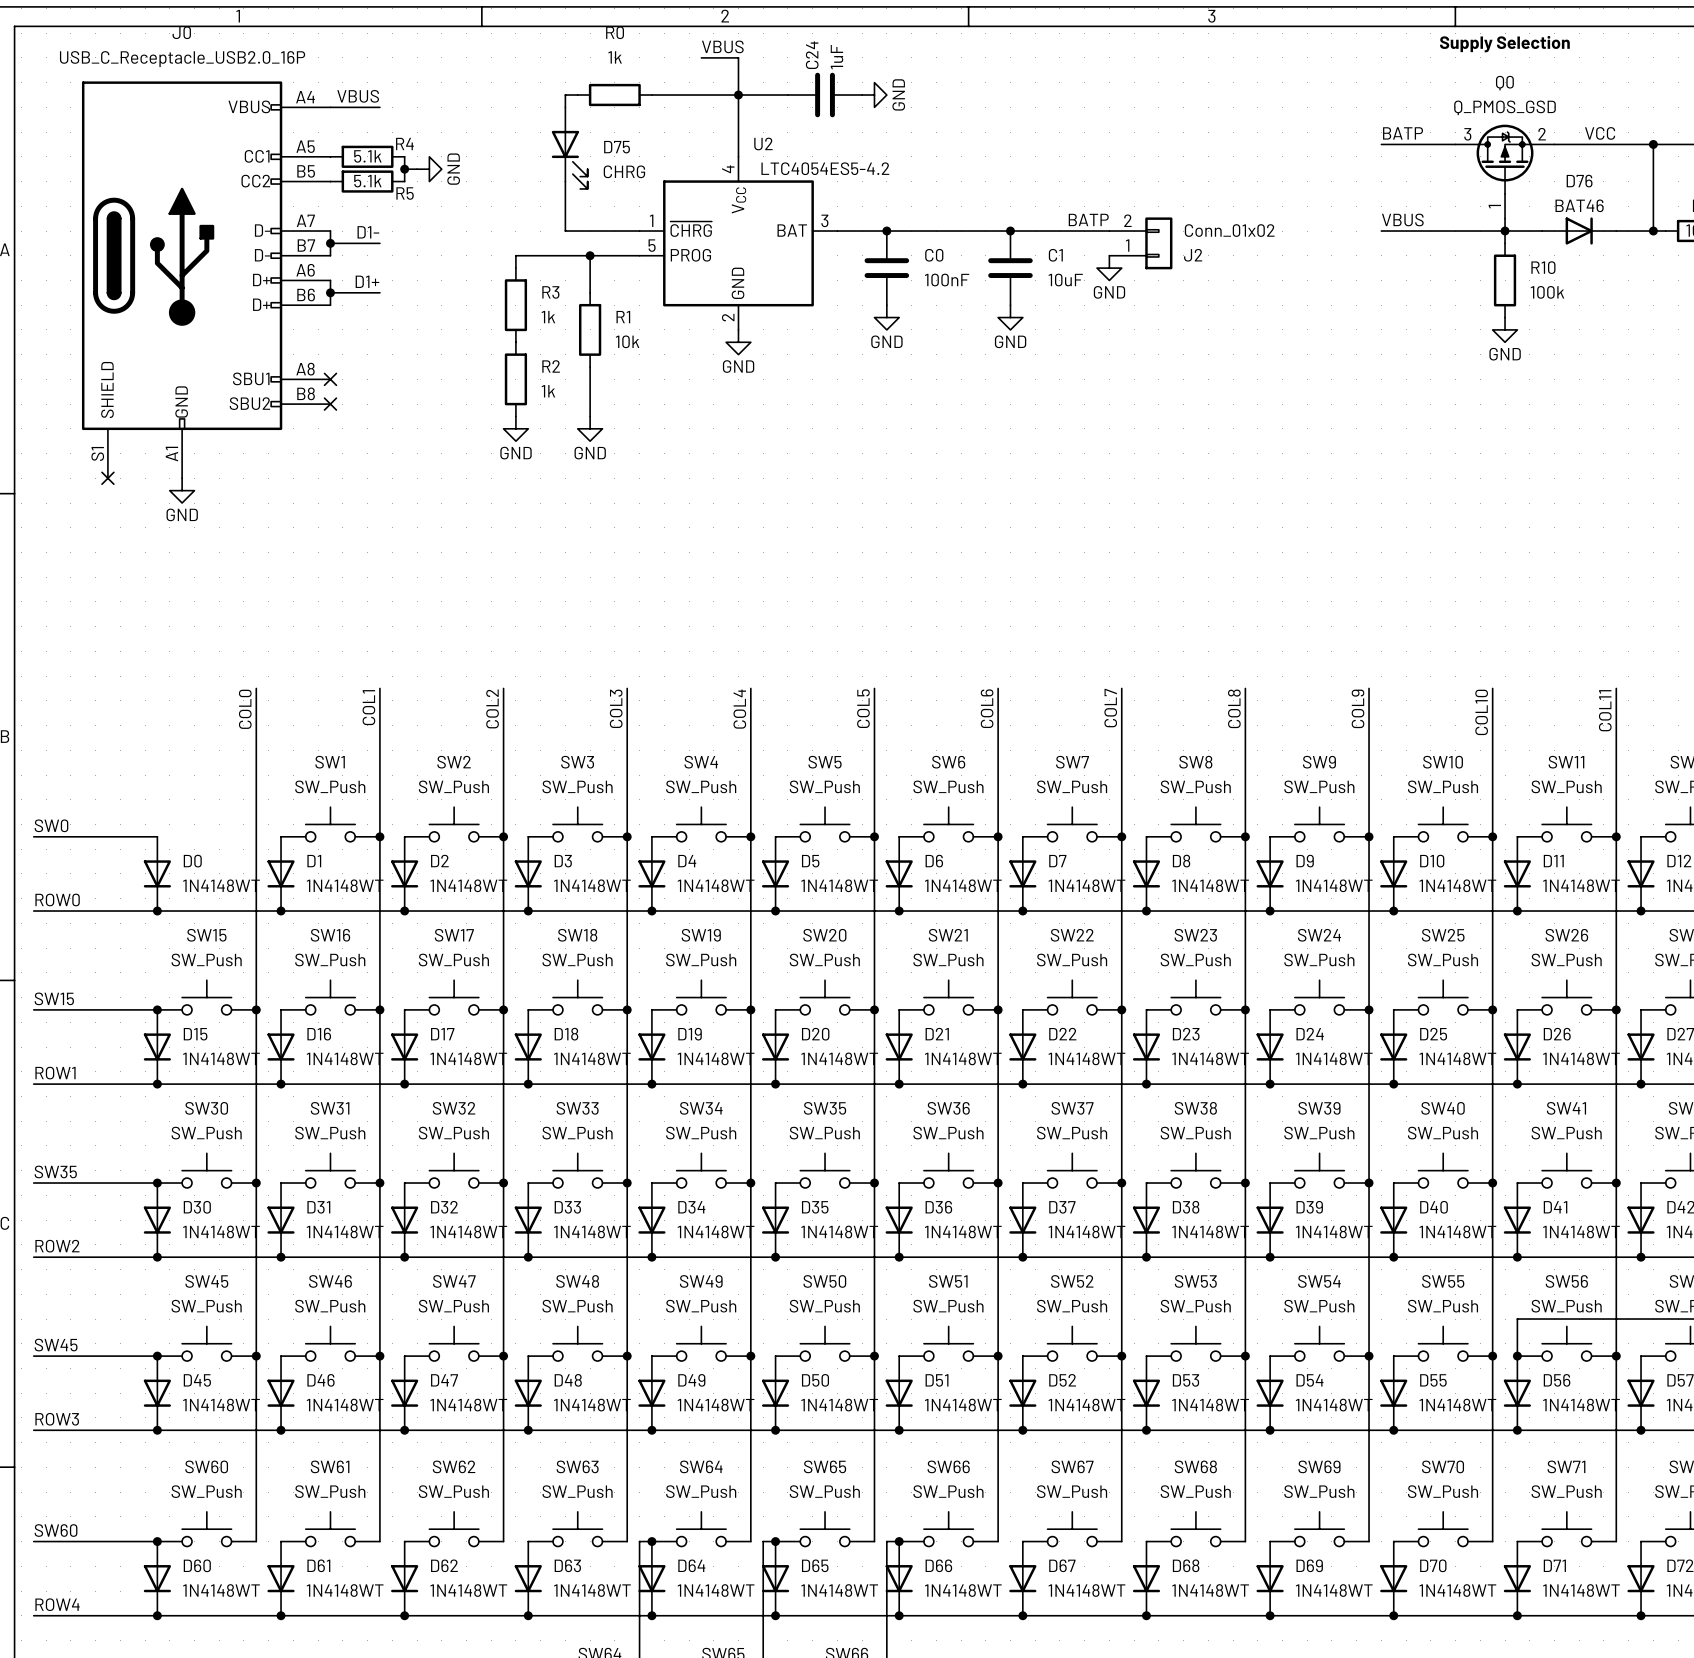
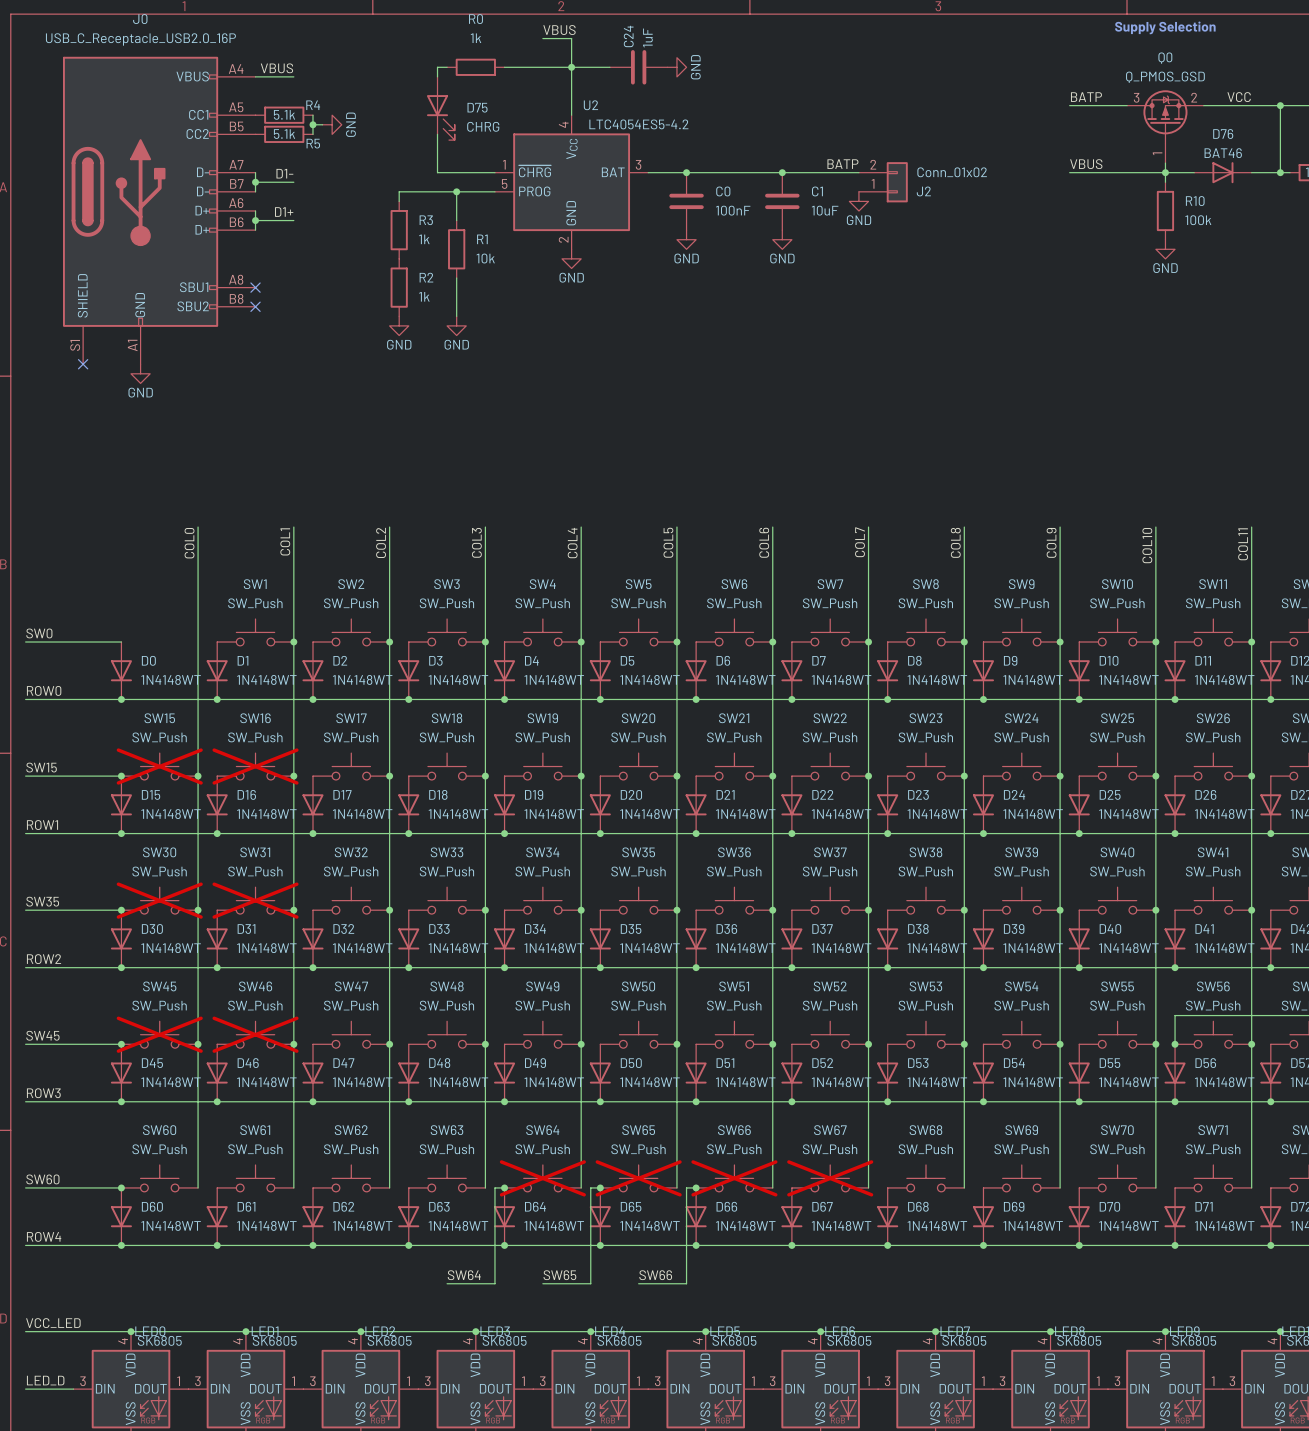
SW15 do-not-place cross: none -> (159, 766)
SW16 do-not-place cross: none -> (255, 766)
SW30 do-not-place cross: none -> (159, 900)
SW31 do-not-place cross: none -> (255, 900)
SW45 do-not-place cross: none -> (159, 1034)
SW46 do-not-place cross: none -> (255, 1034)
SW64 do-not-place cross: none -> (542, 1178)
SW65 do-not-place cross: none -> (638, 1178)
SW66 do-not-place cross: none -> (734, 1178)
SW67 do-not-place cross: none -> (830, 1178)

